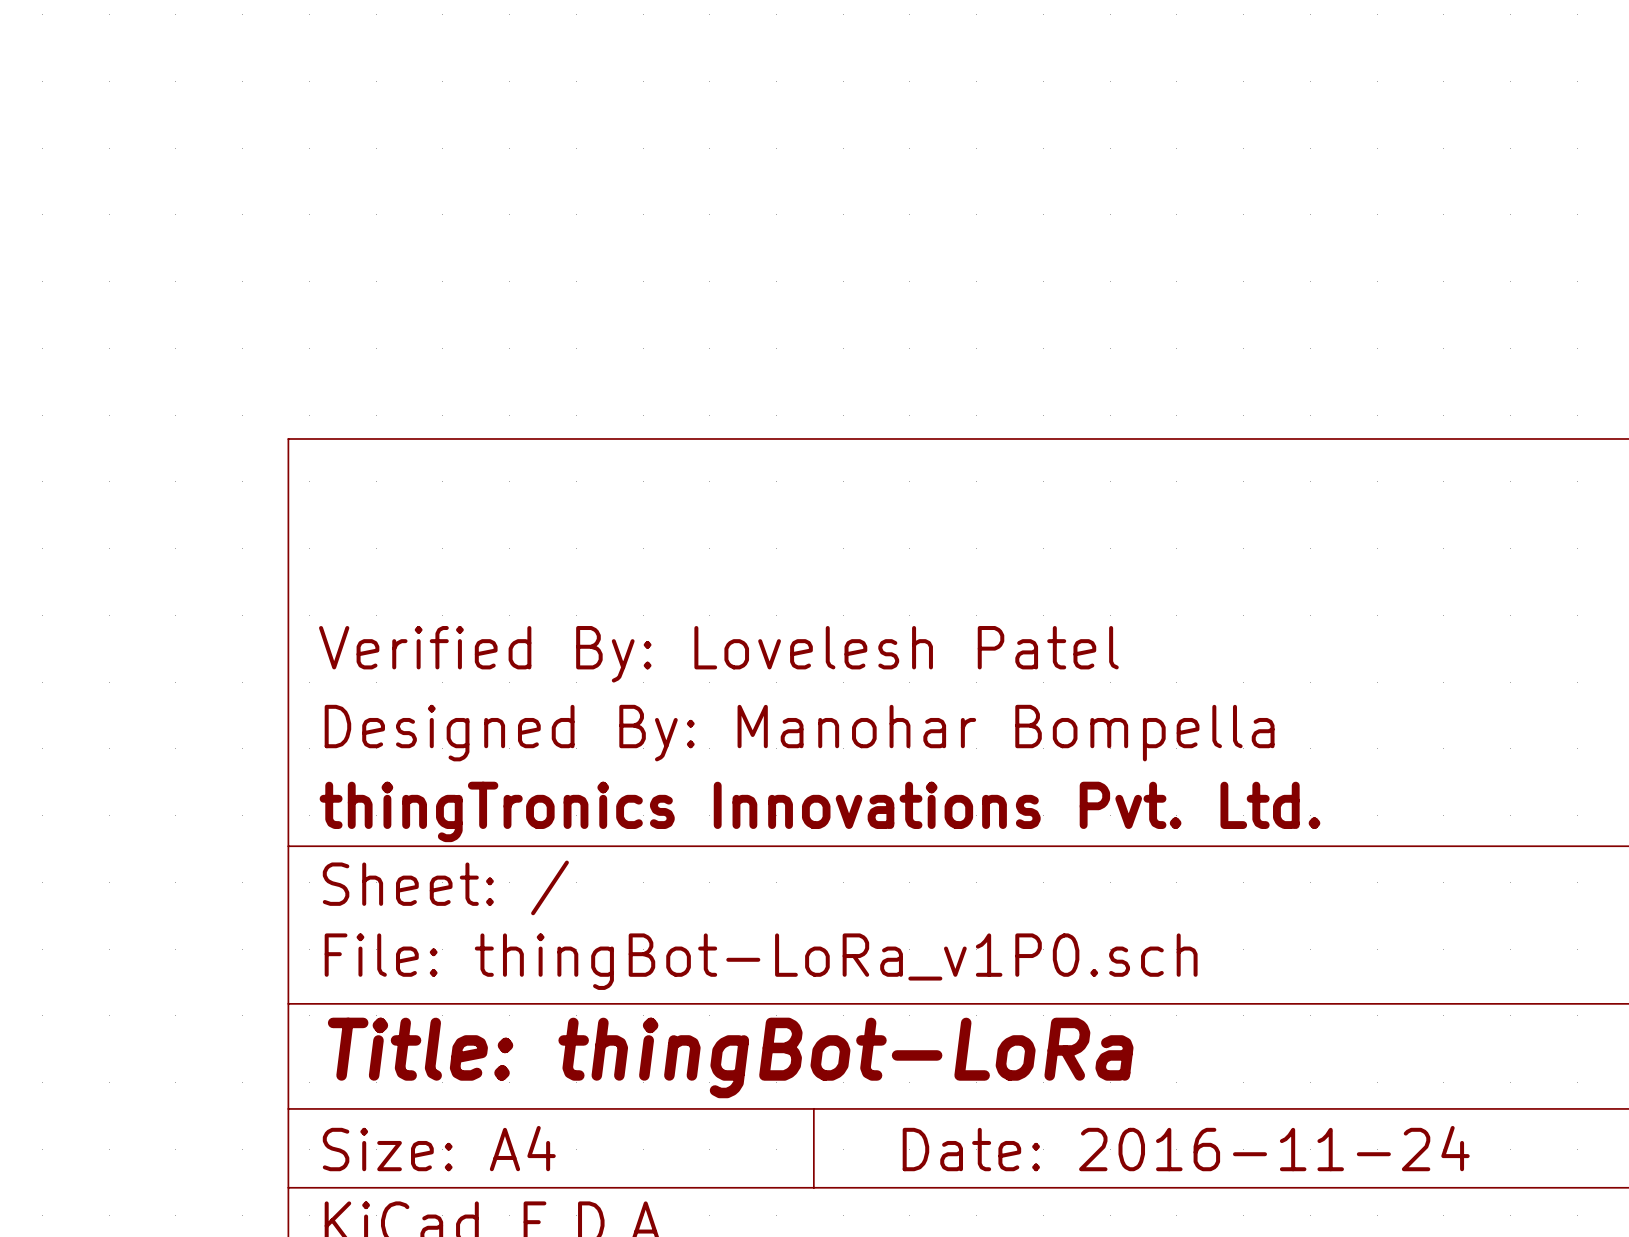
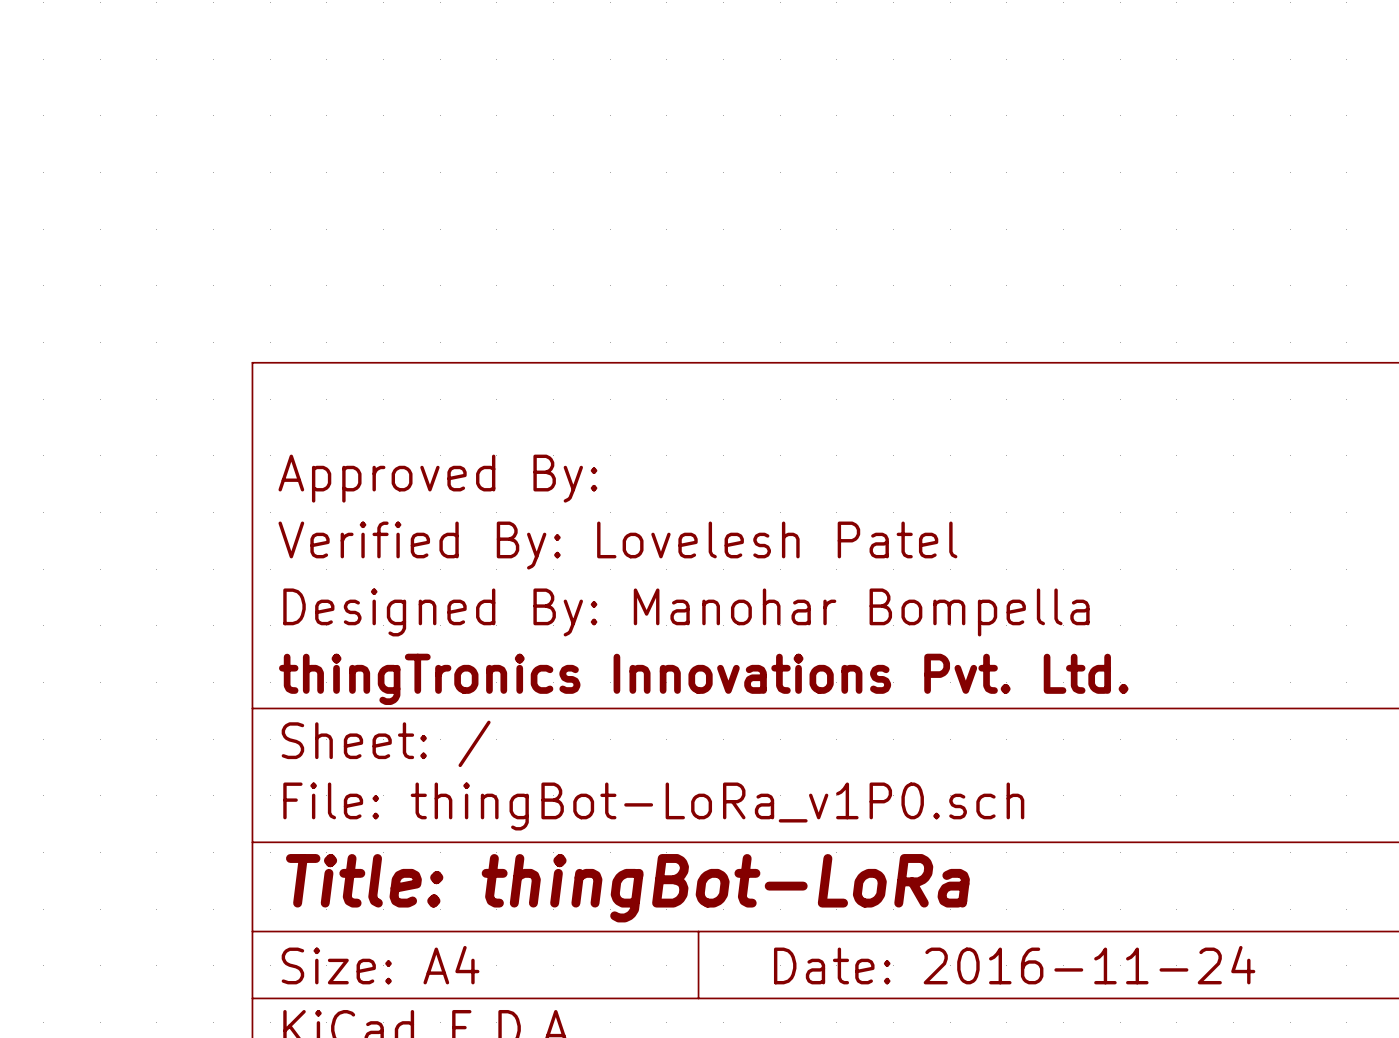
title block: none -> Approved By: (437, 478)

